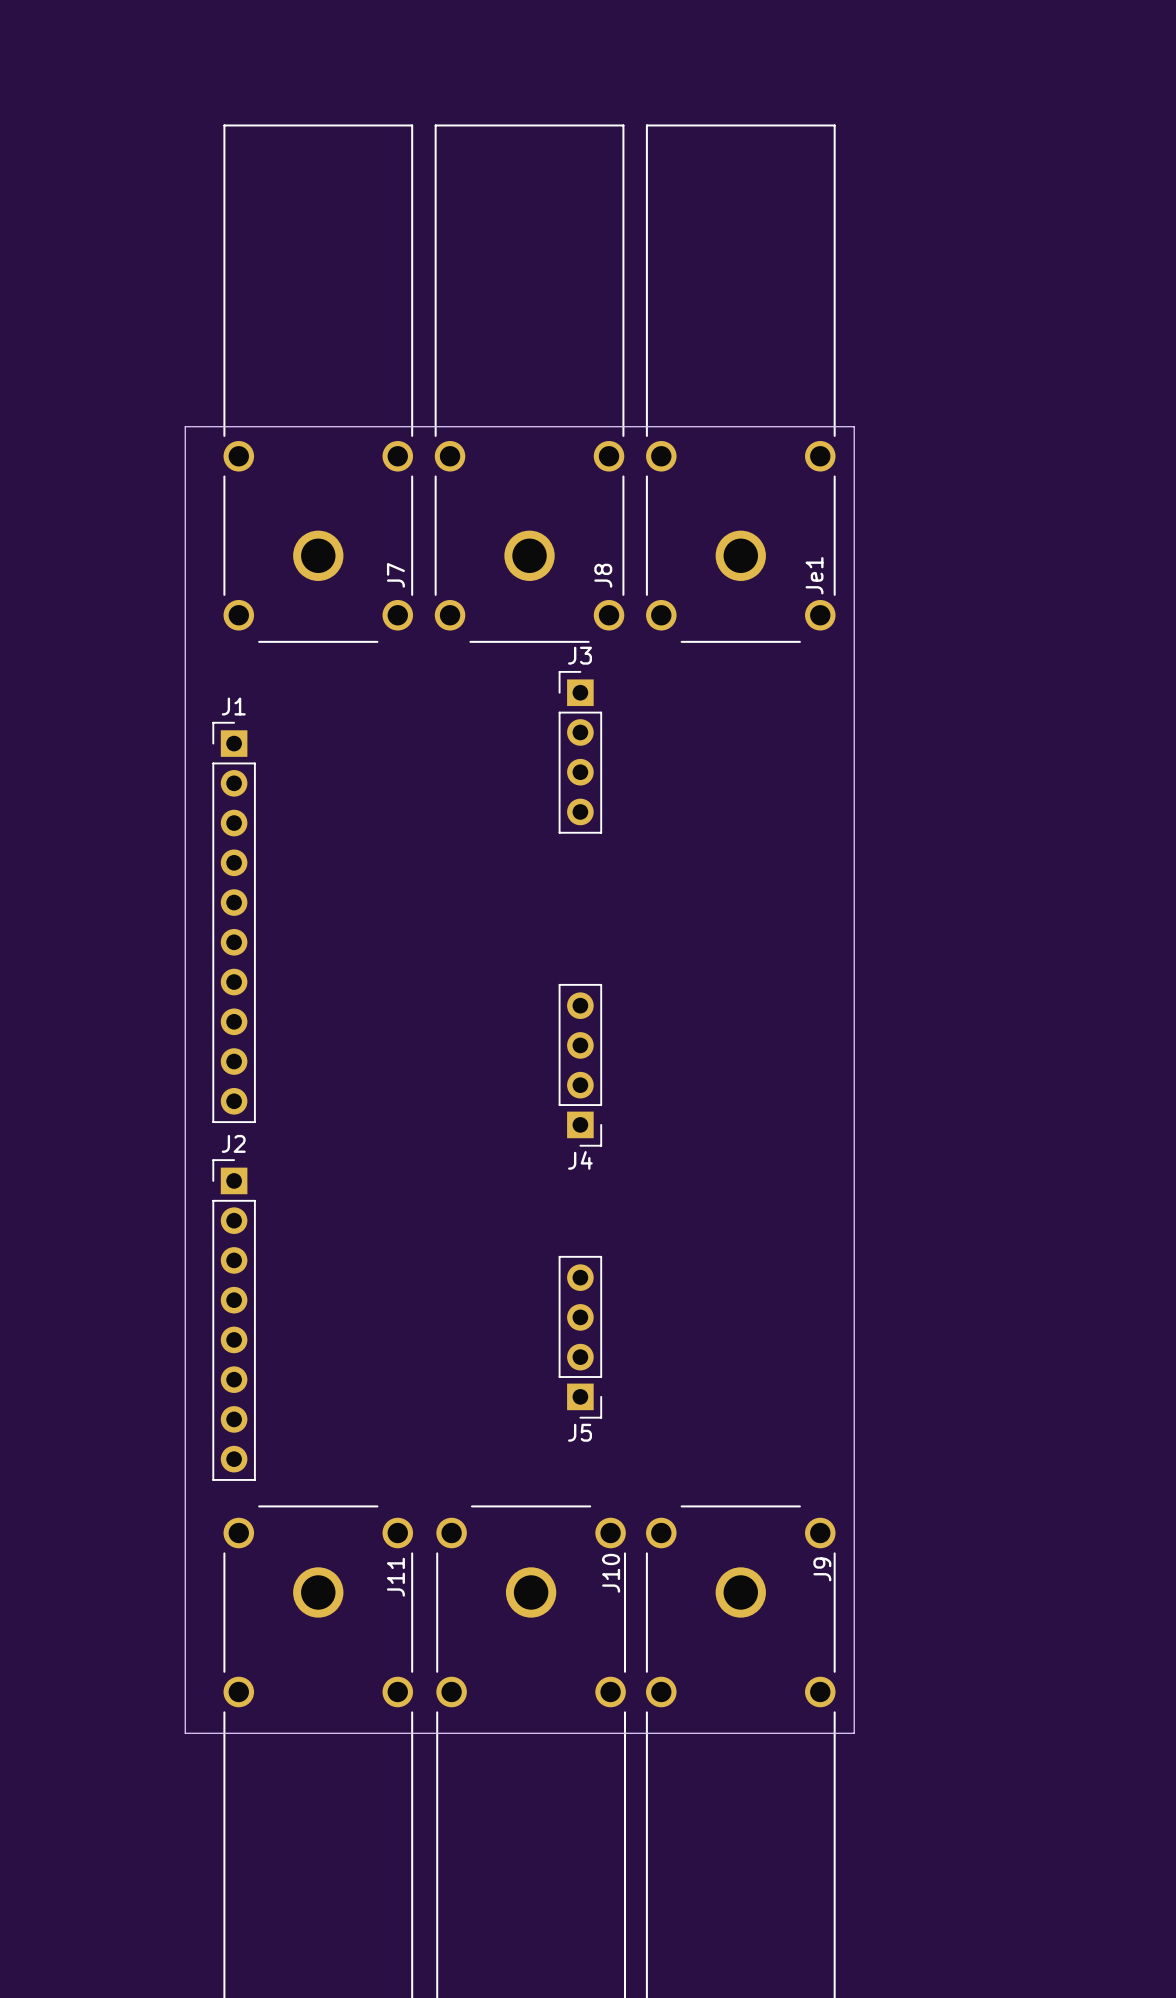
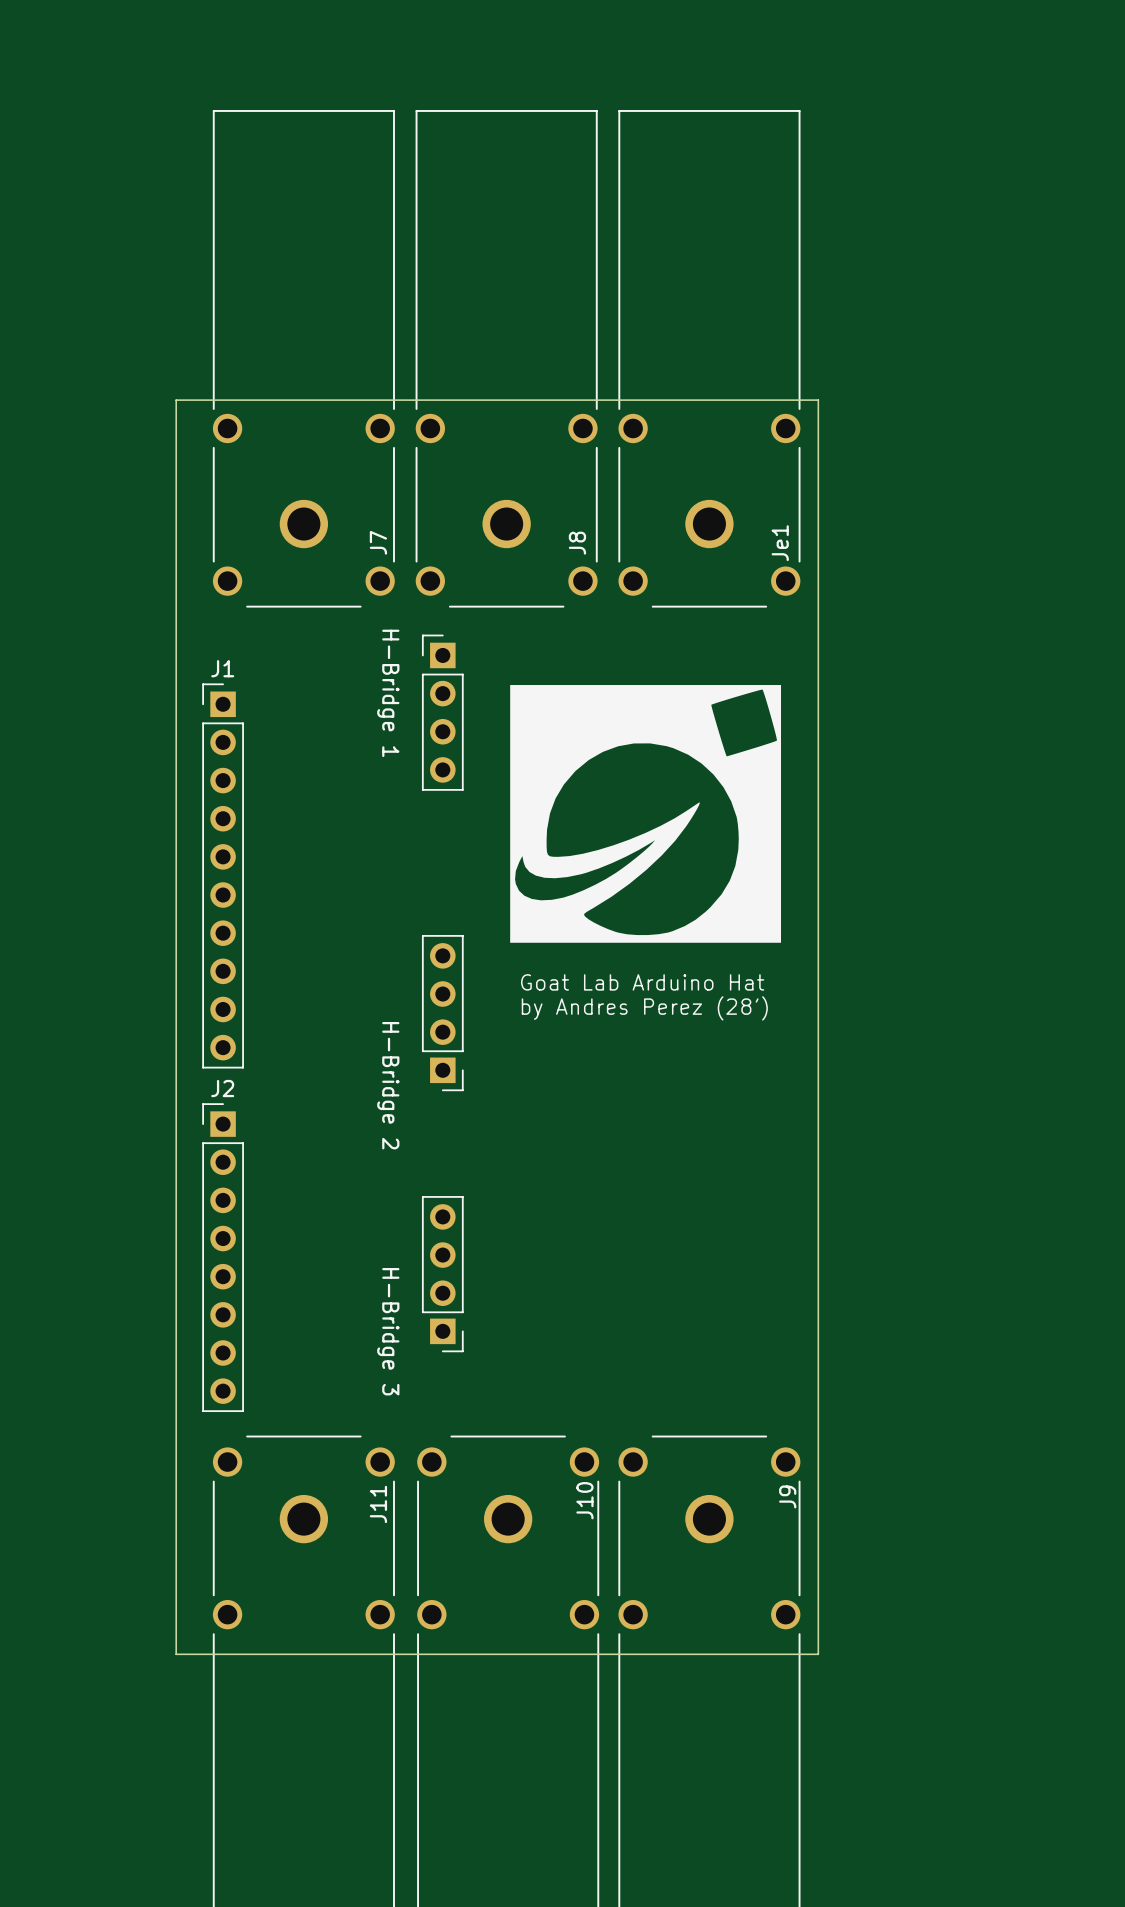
drawing: none -> [510, 685, 782, 943]
H-Bridge 1: none -> (442, 712)
J3: (580, 752) -> none
text: none -> Goat Lab Arduino Hat (642, 982)
text: none -> by Andres Perez (28') (644, 1008)
H-Bridge 2: none -> (442, 1013)
J4: (580, 1065) -> none
H-Bridge 3: none -> (442, 1274)
J5: (580, 1337) -> none

